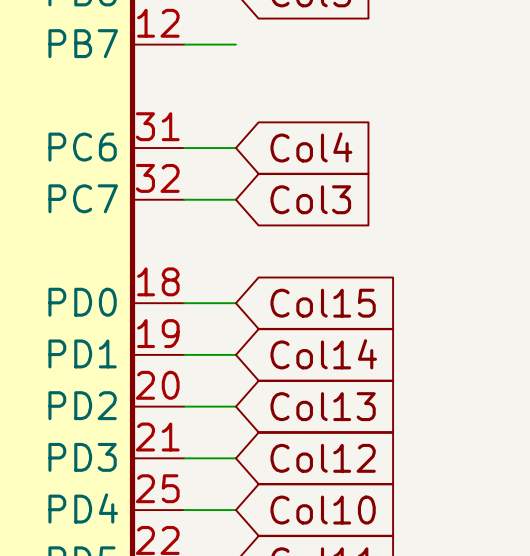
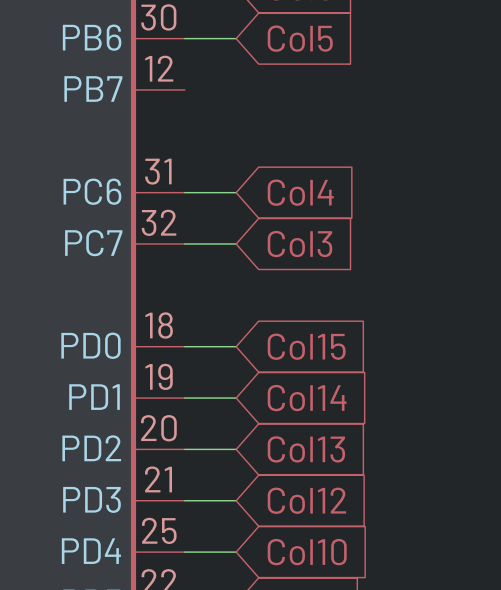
wire: (184, 44) (235, 44) -> none

